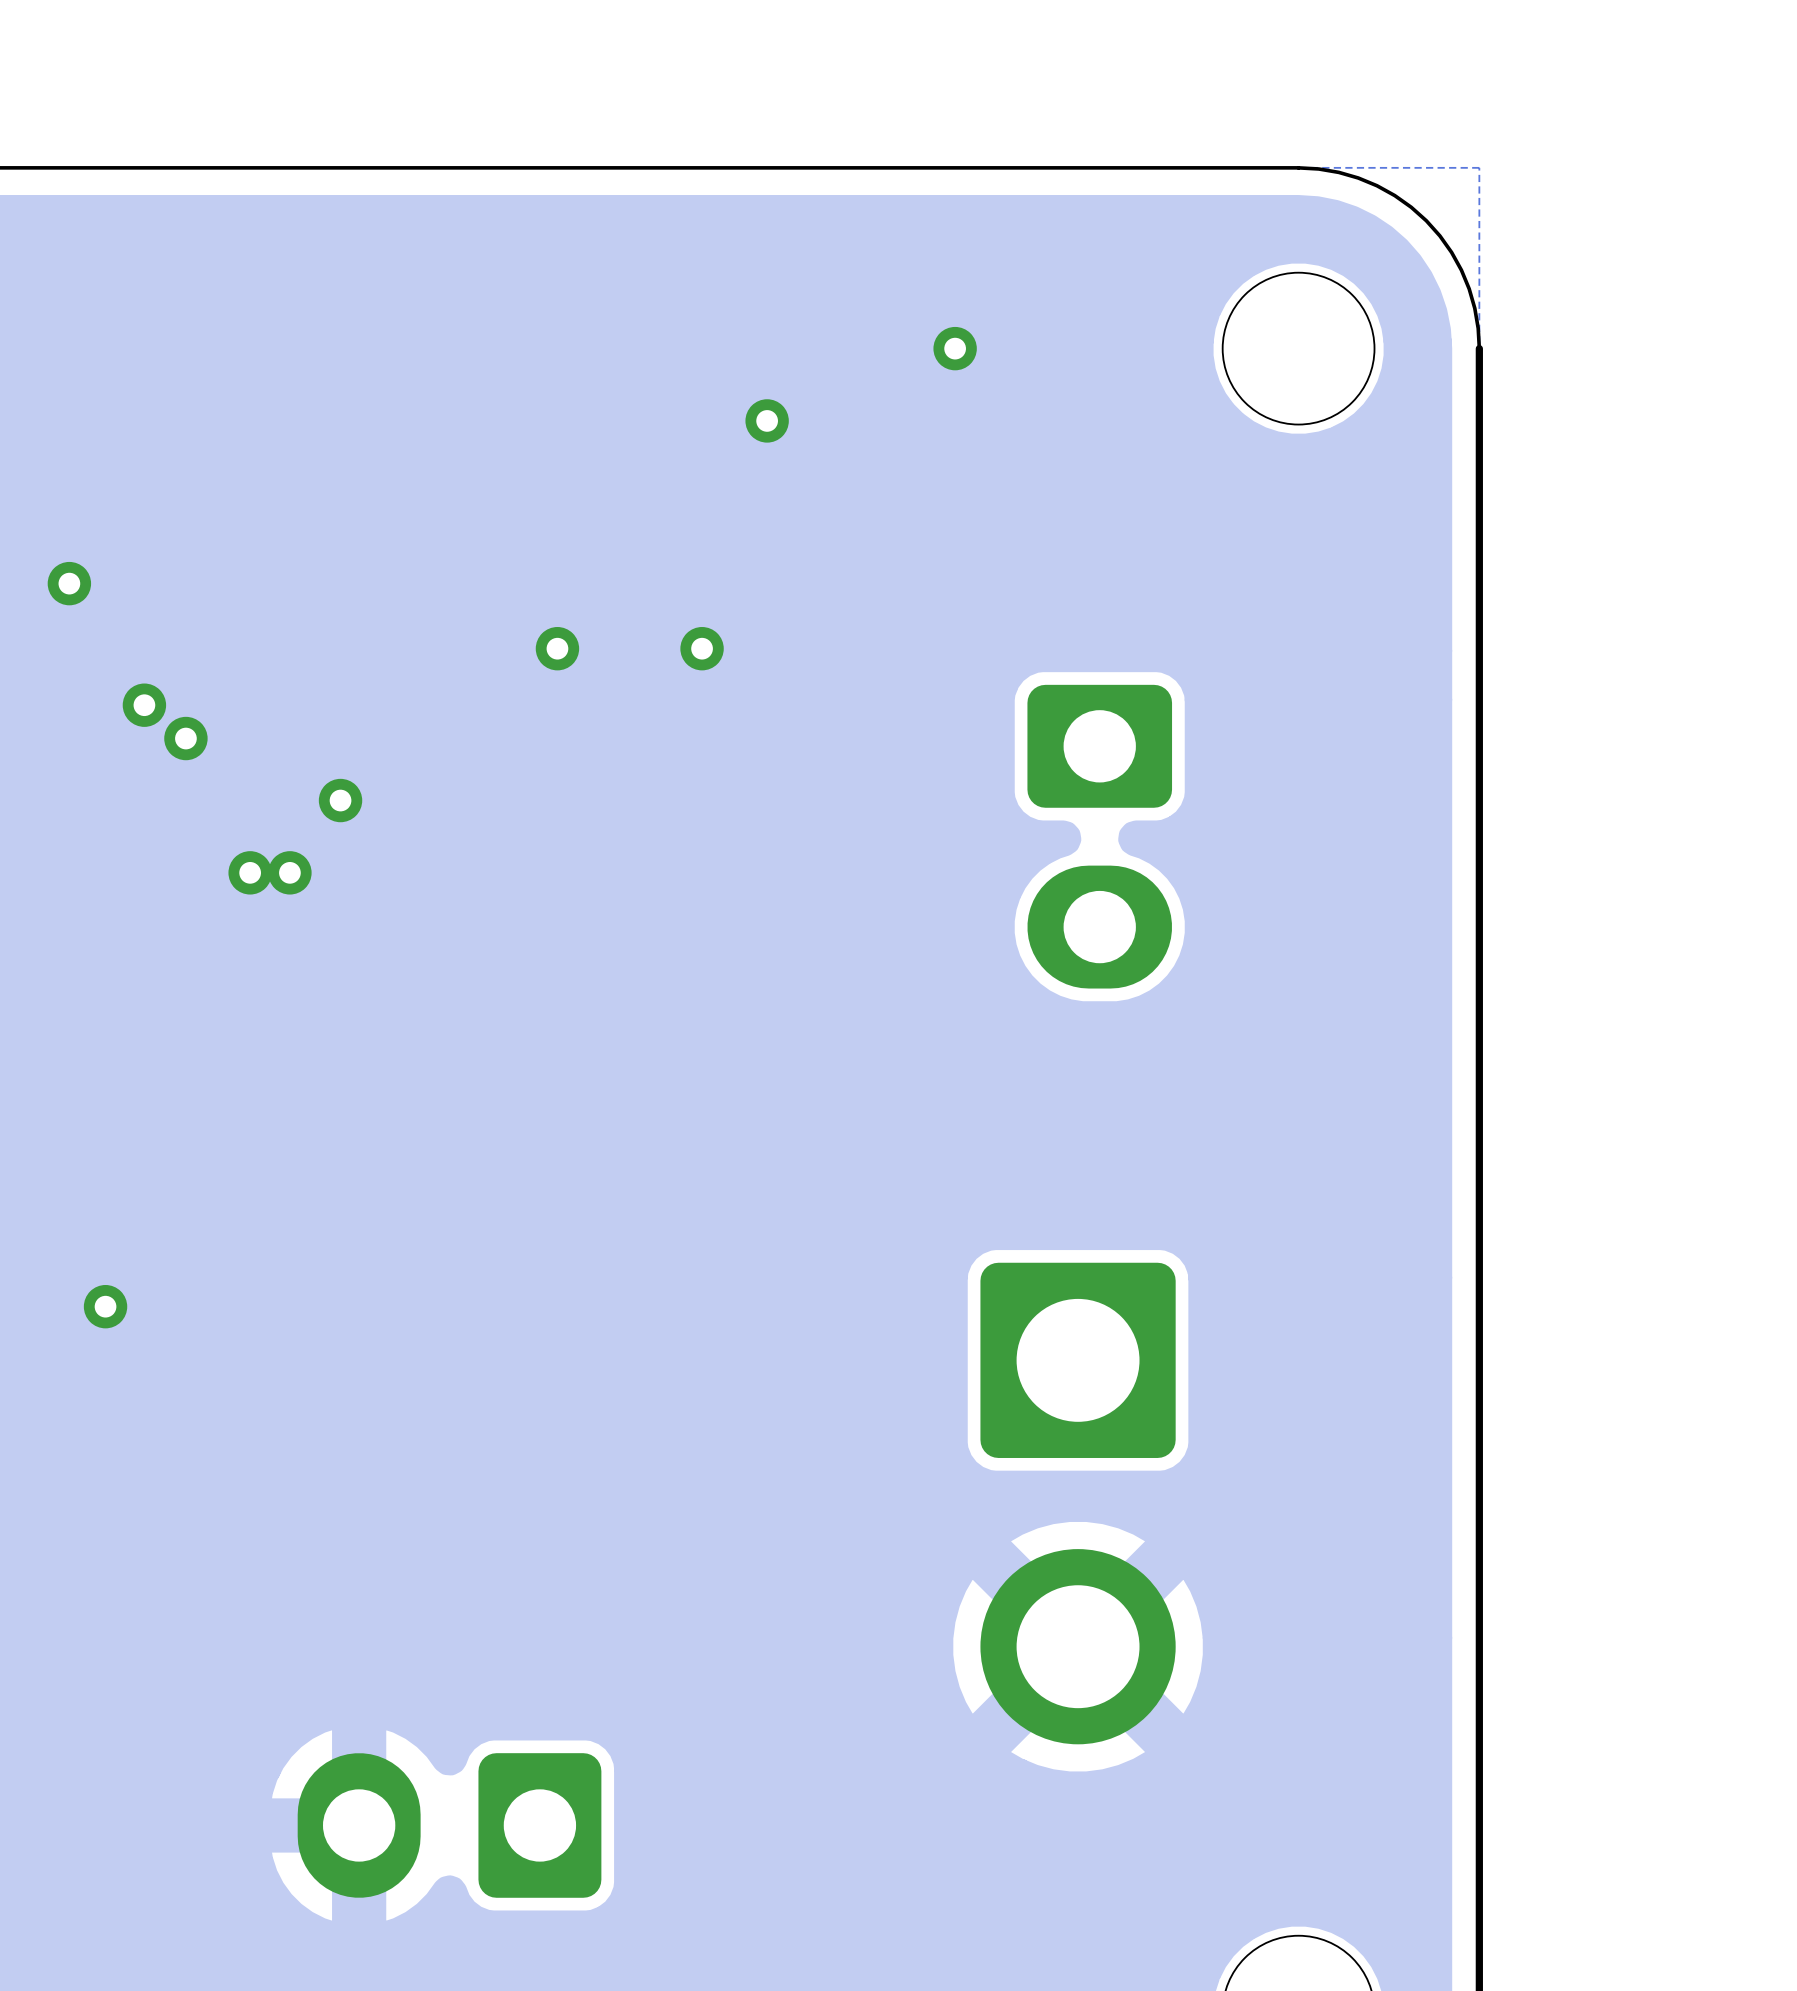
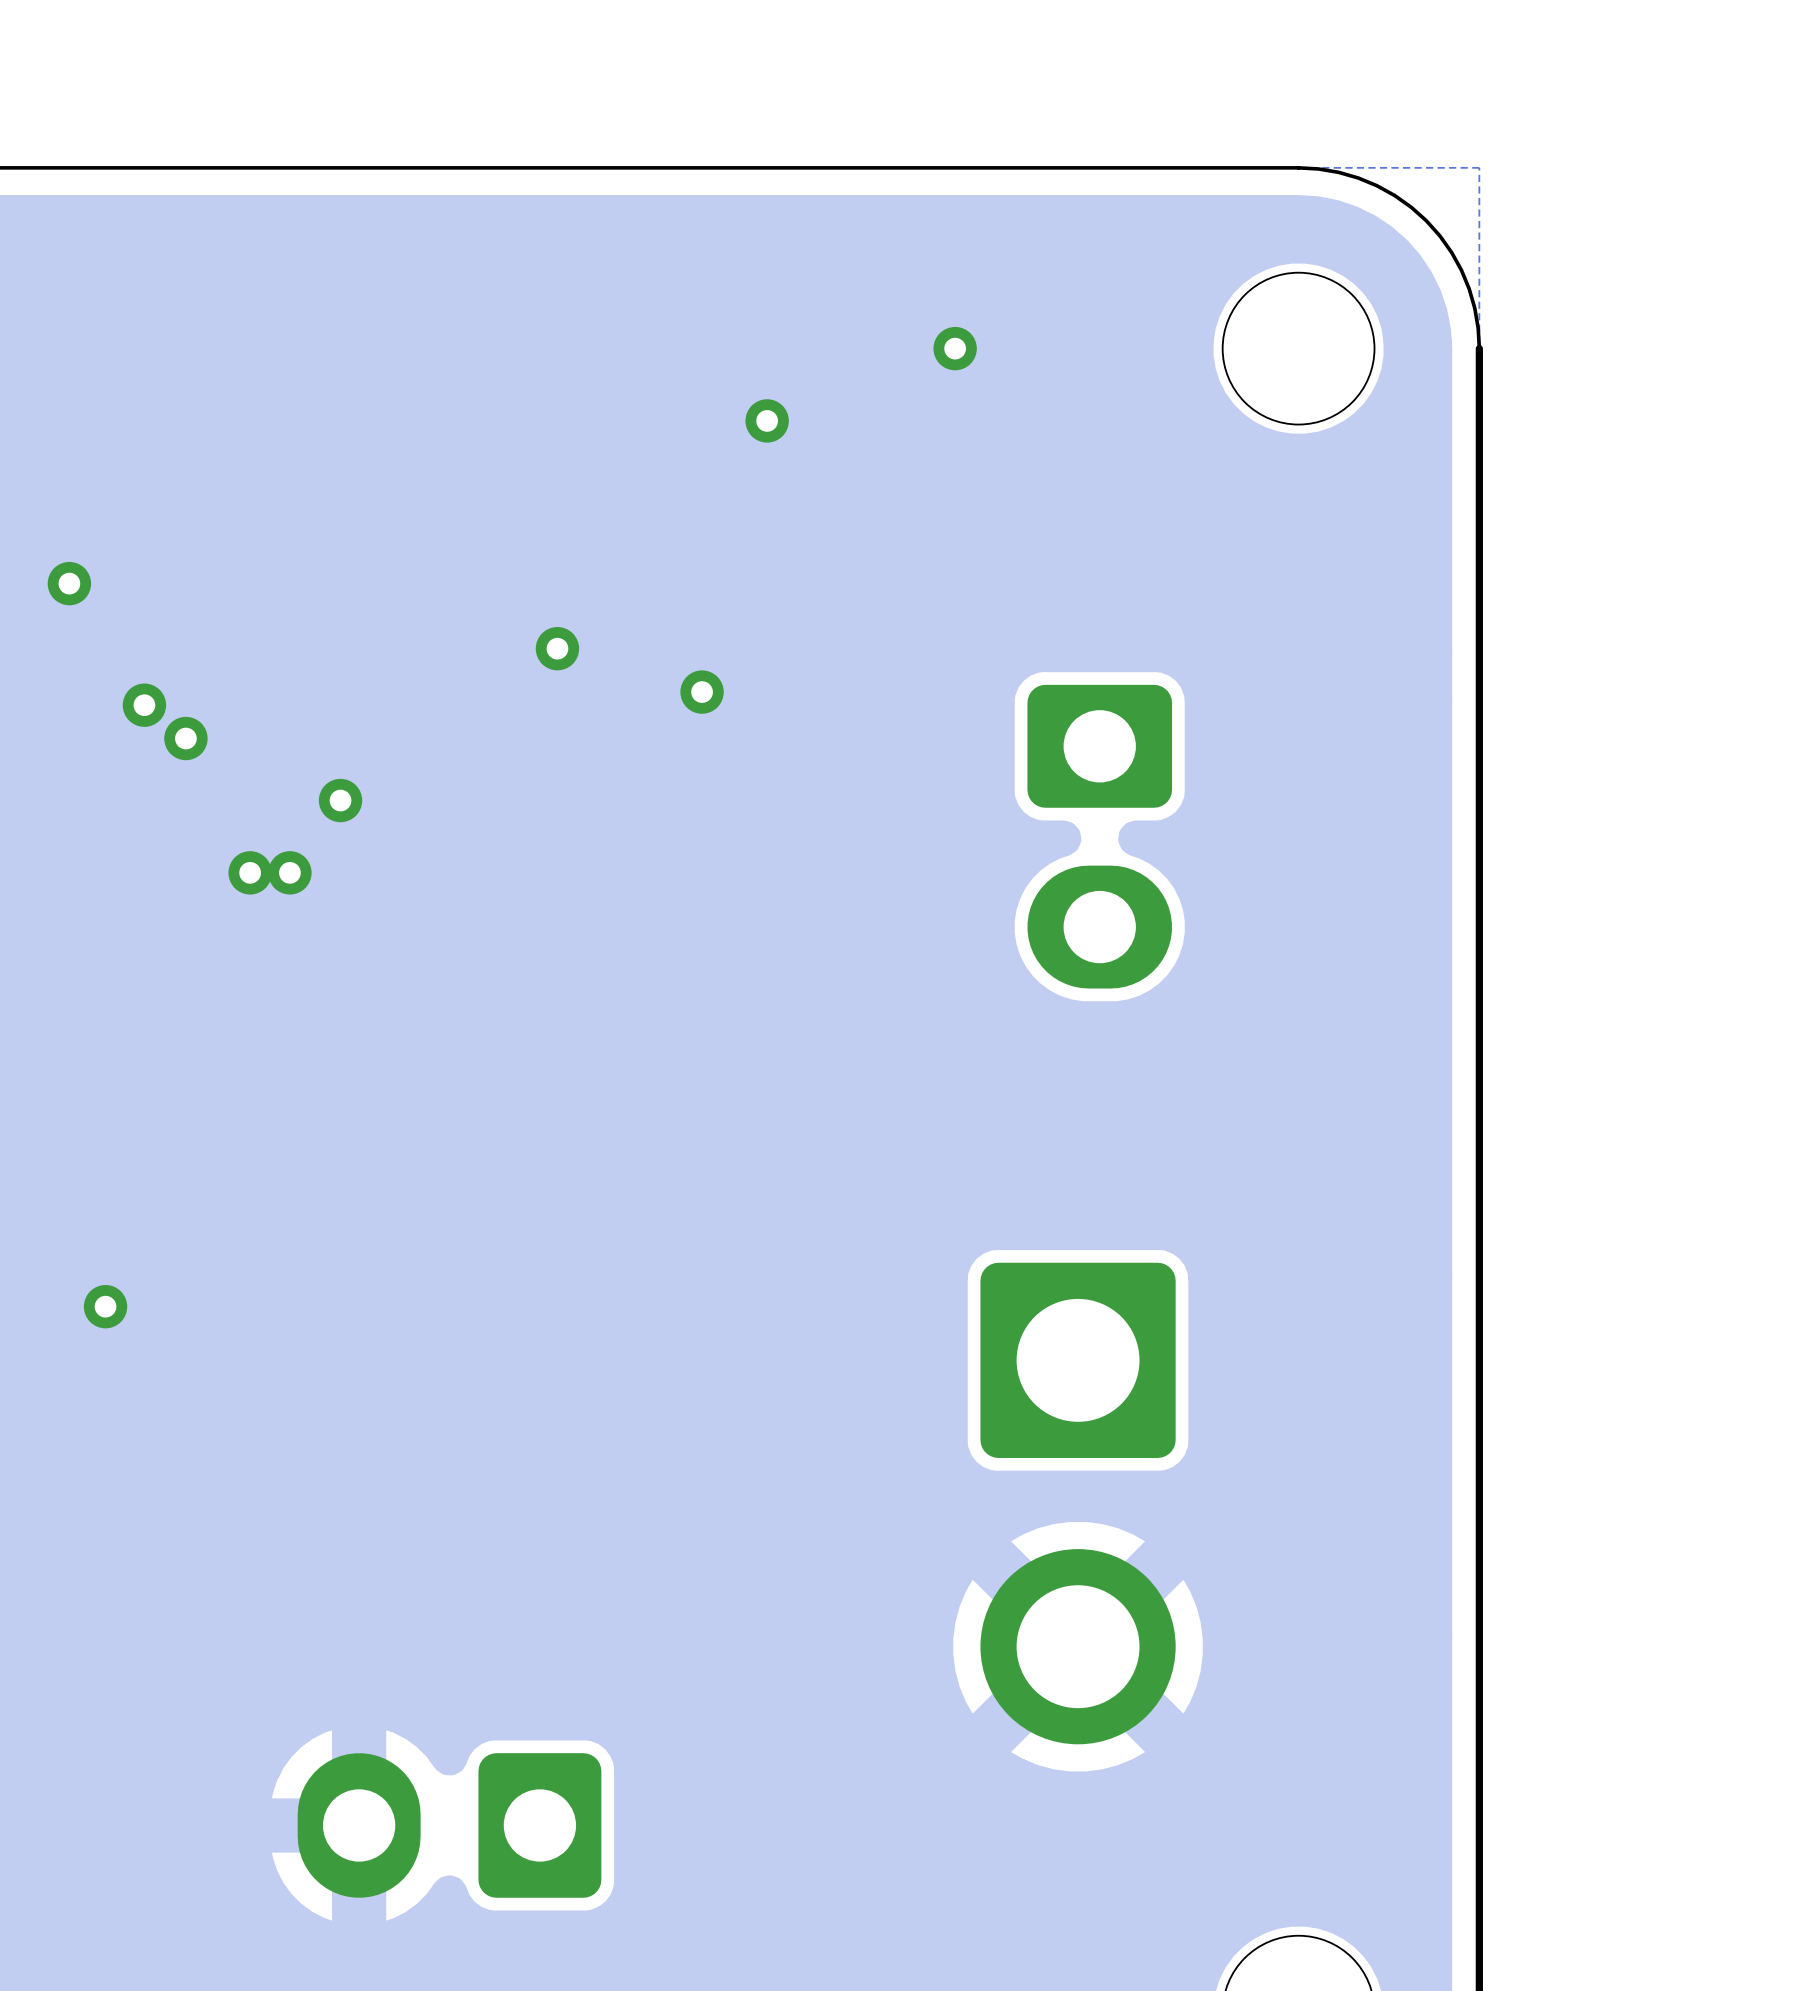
via position: (702, 648) -> (702, 692)

